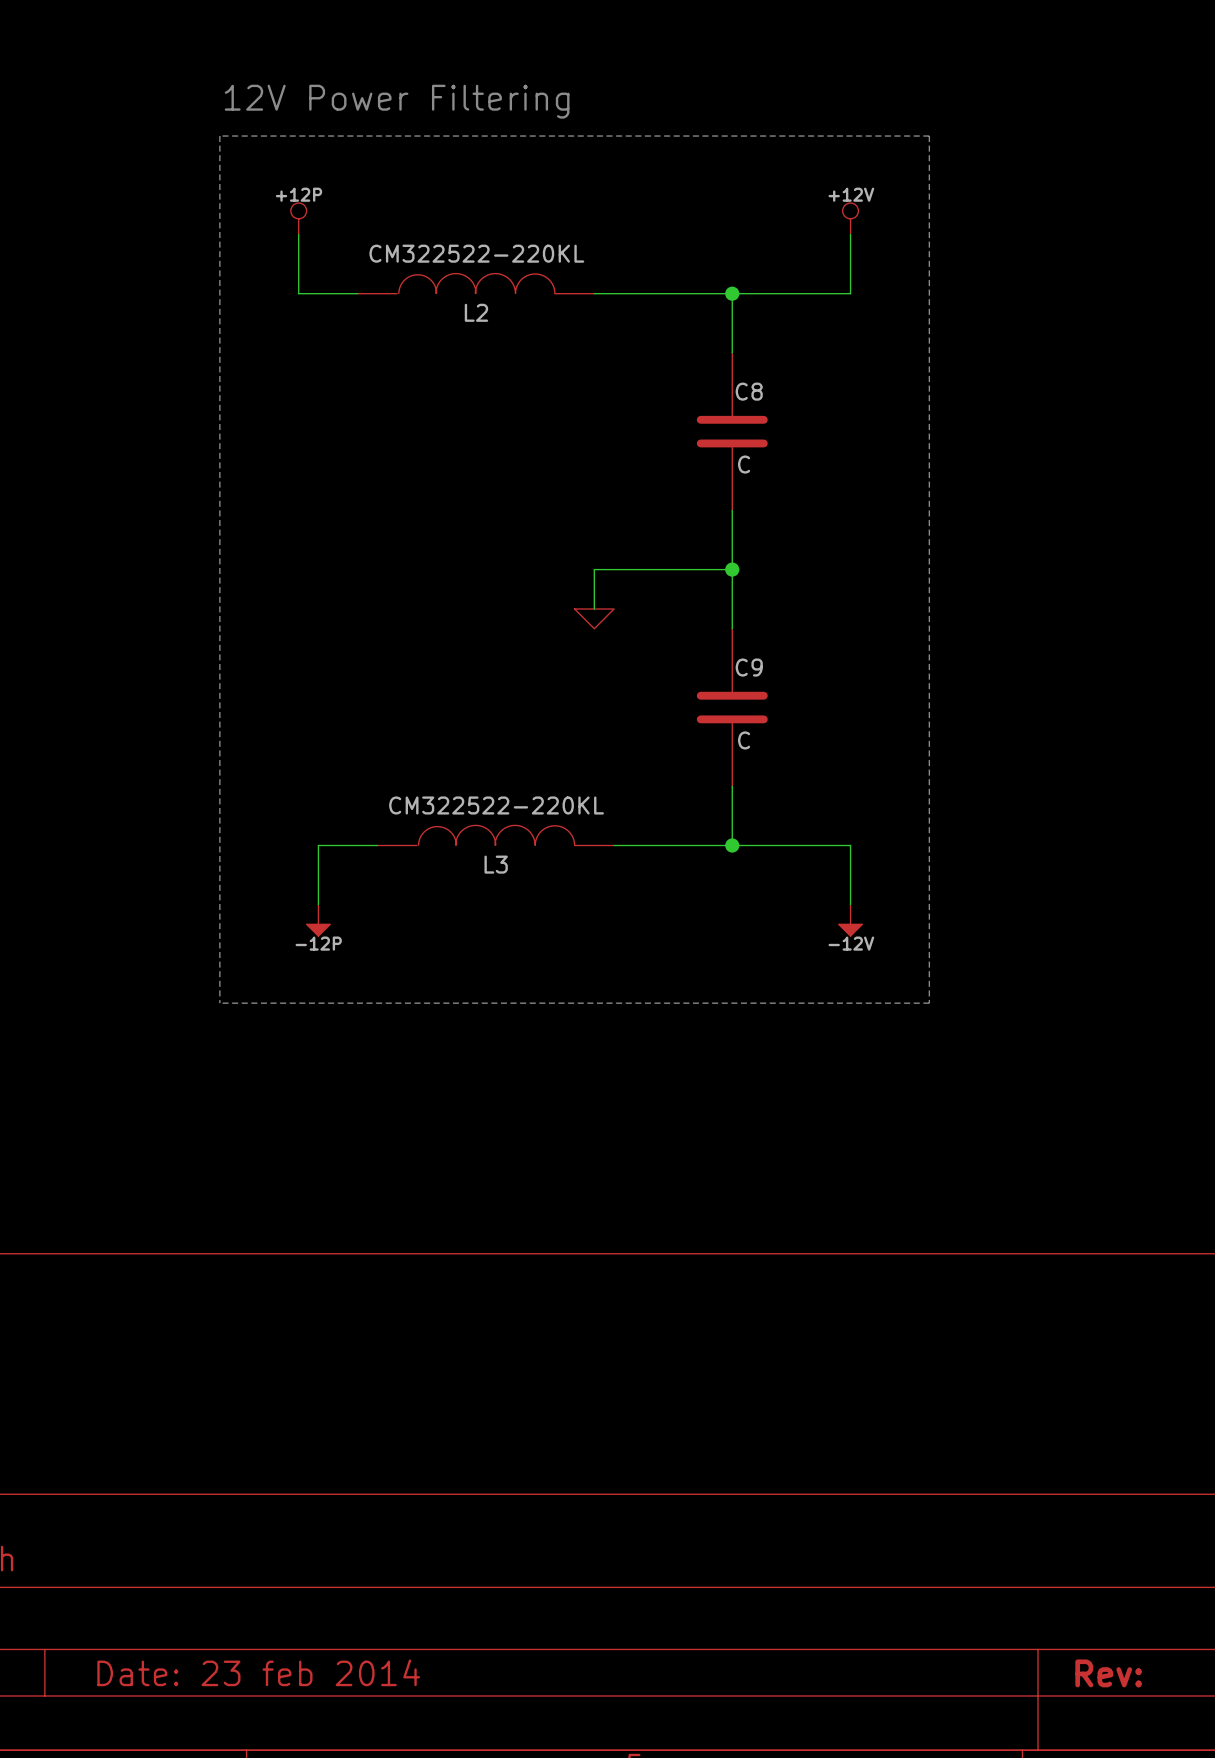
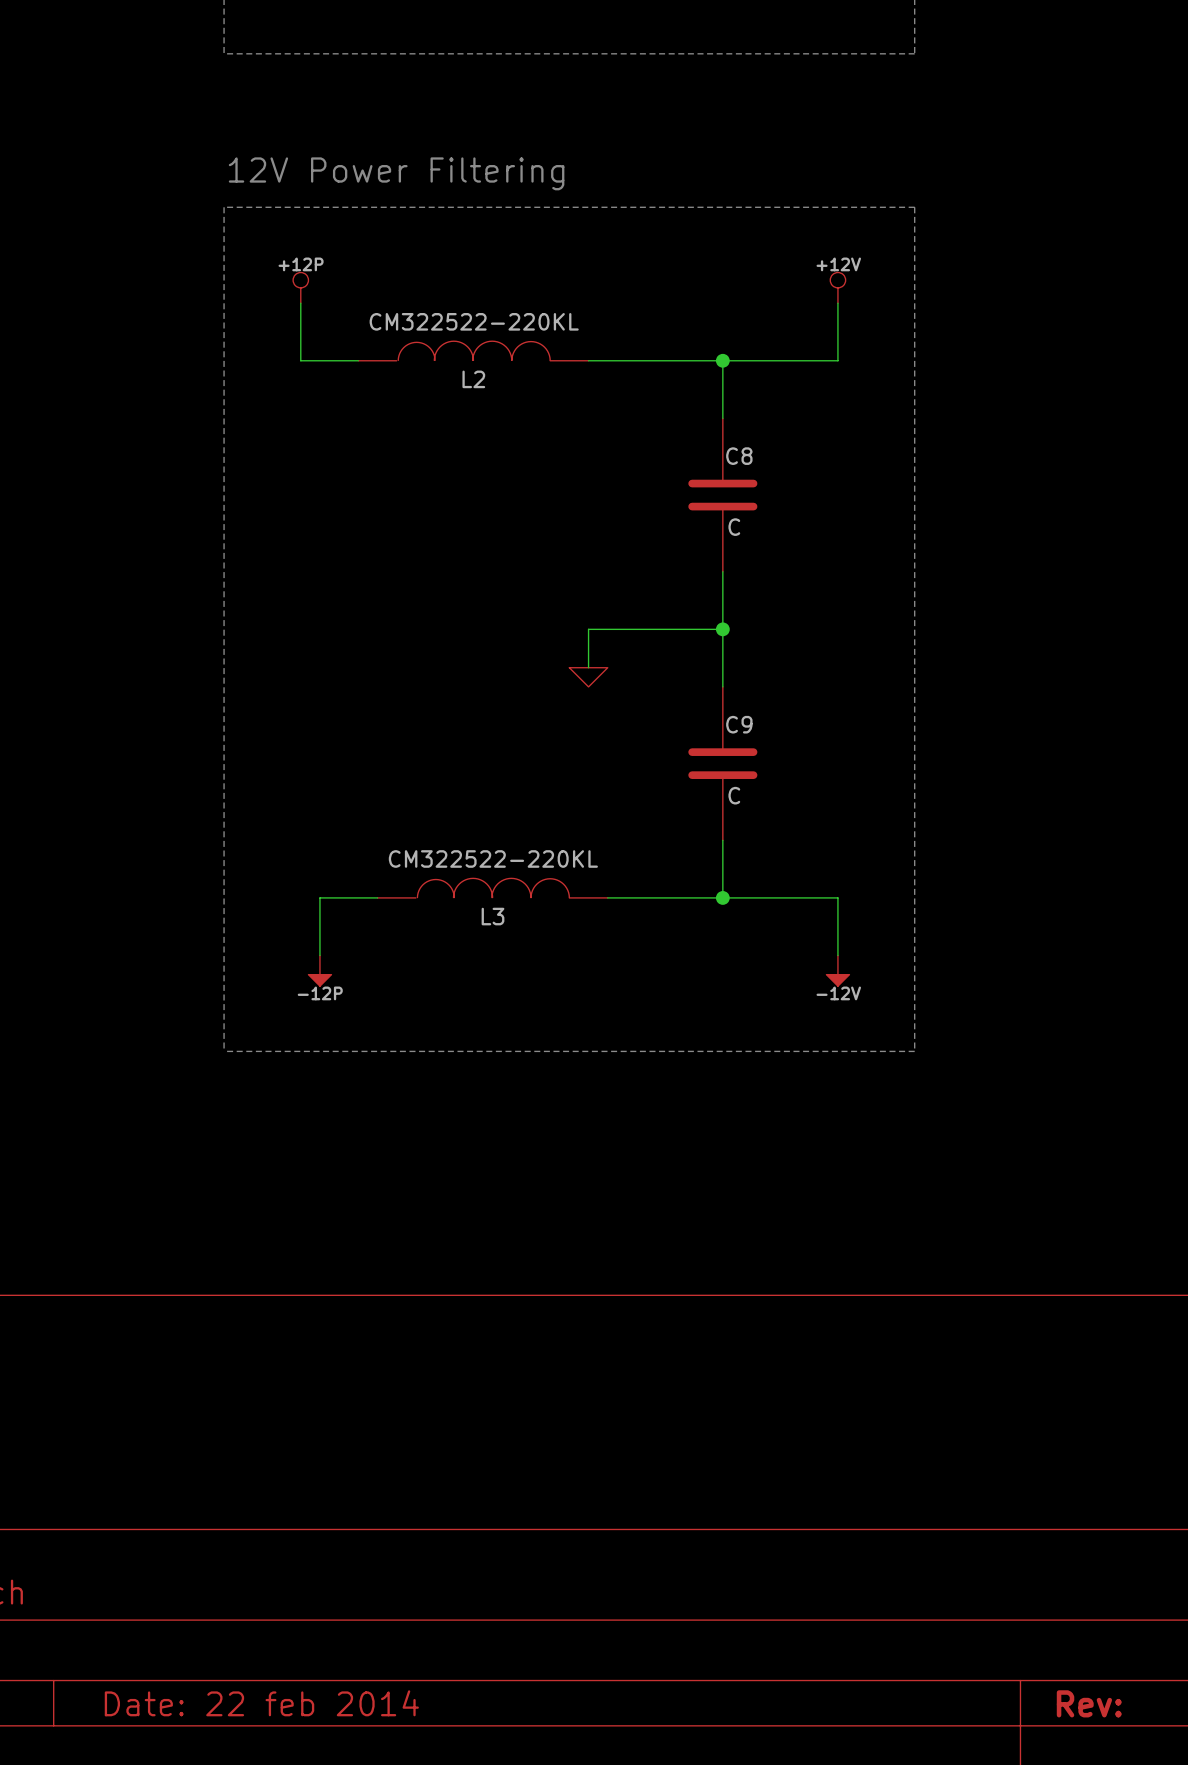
title block: Date: 23 feb 2014 (258, 1672) -> Date: 22 feb 2014 (261, 1703)

